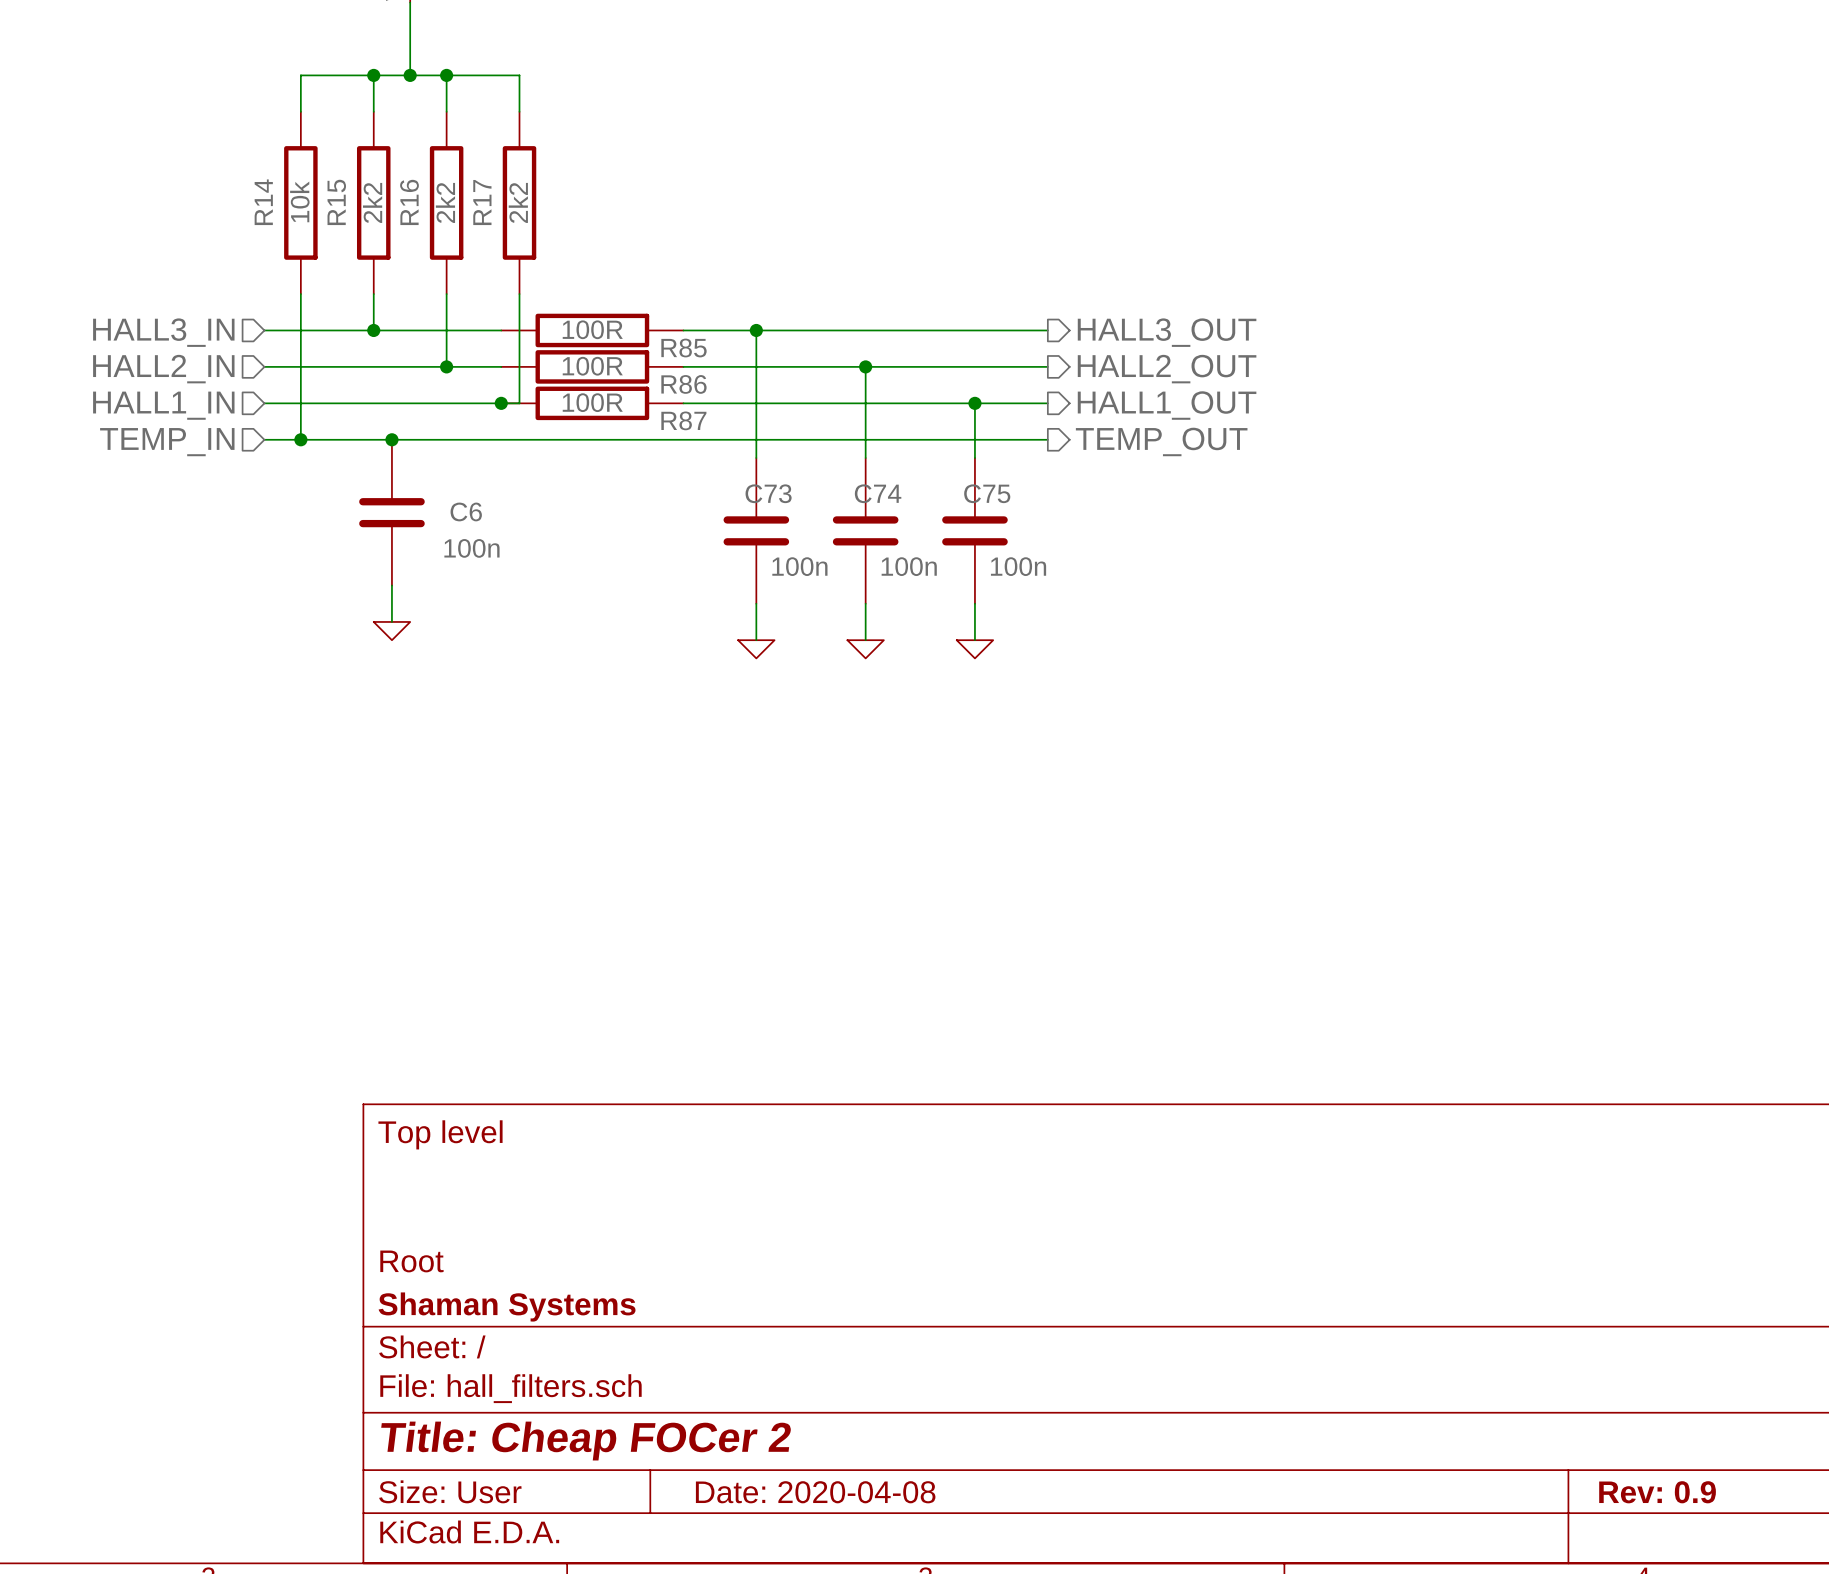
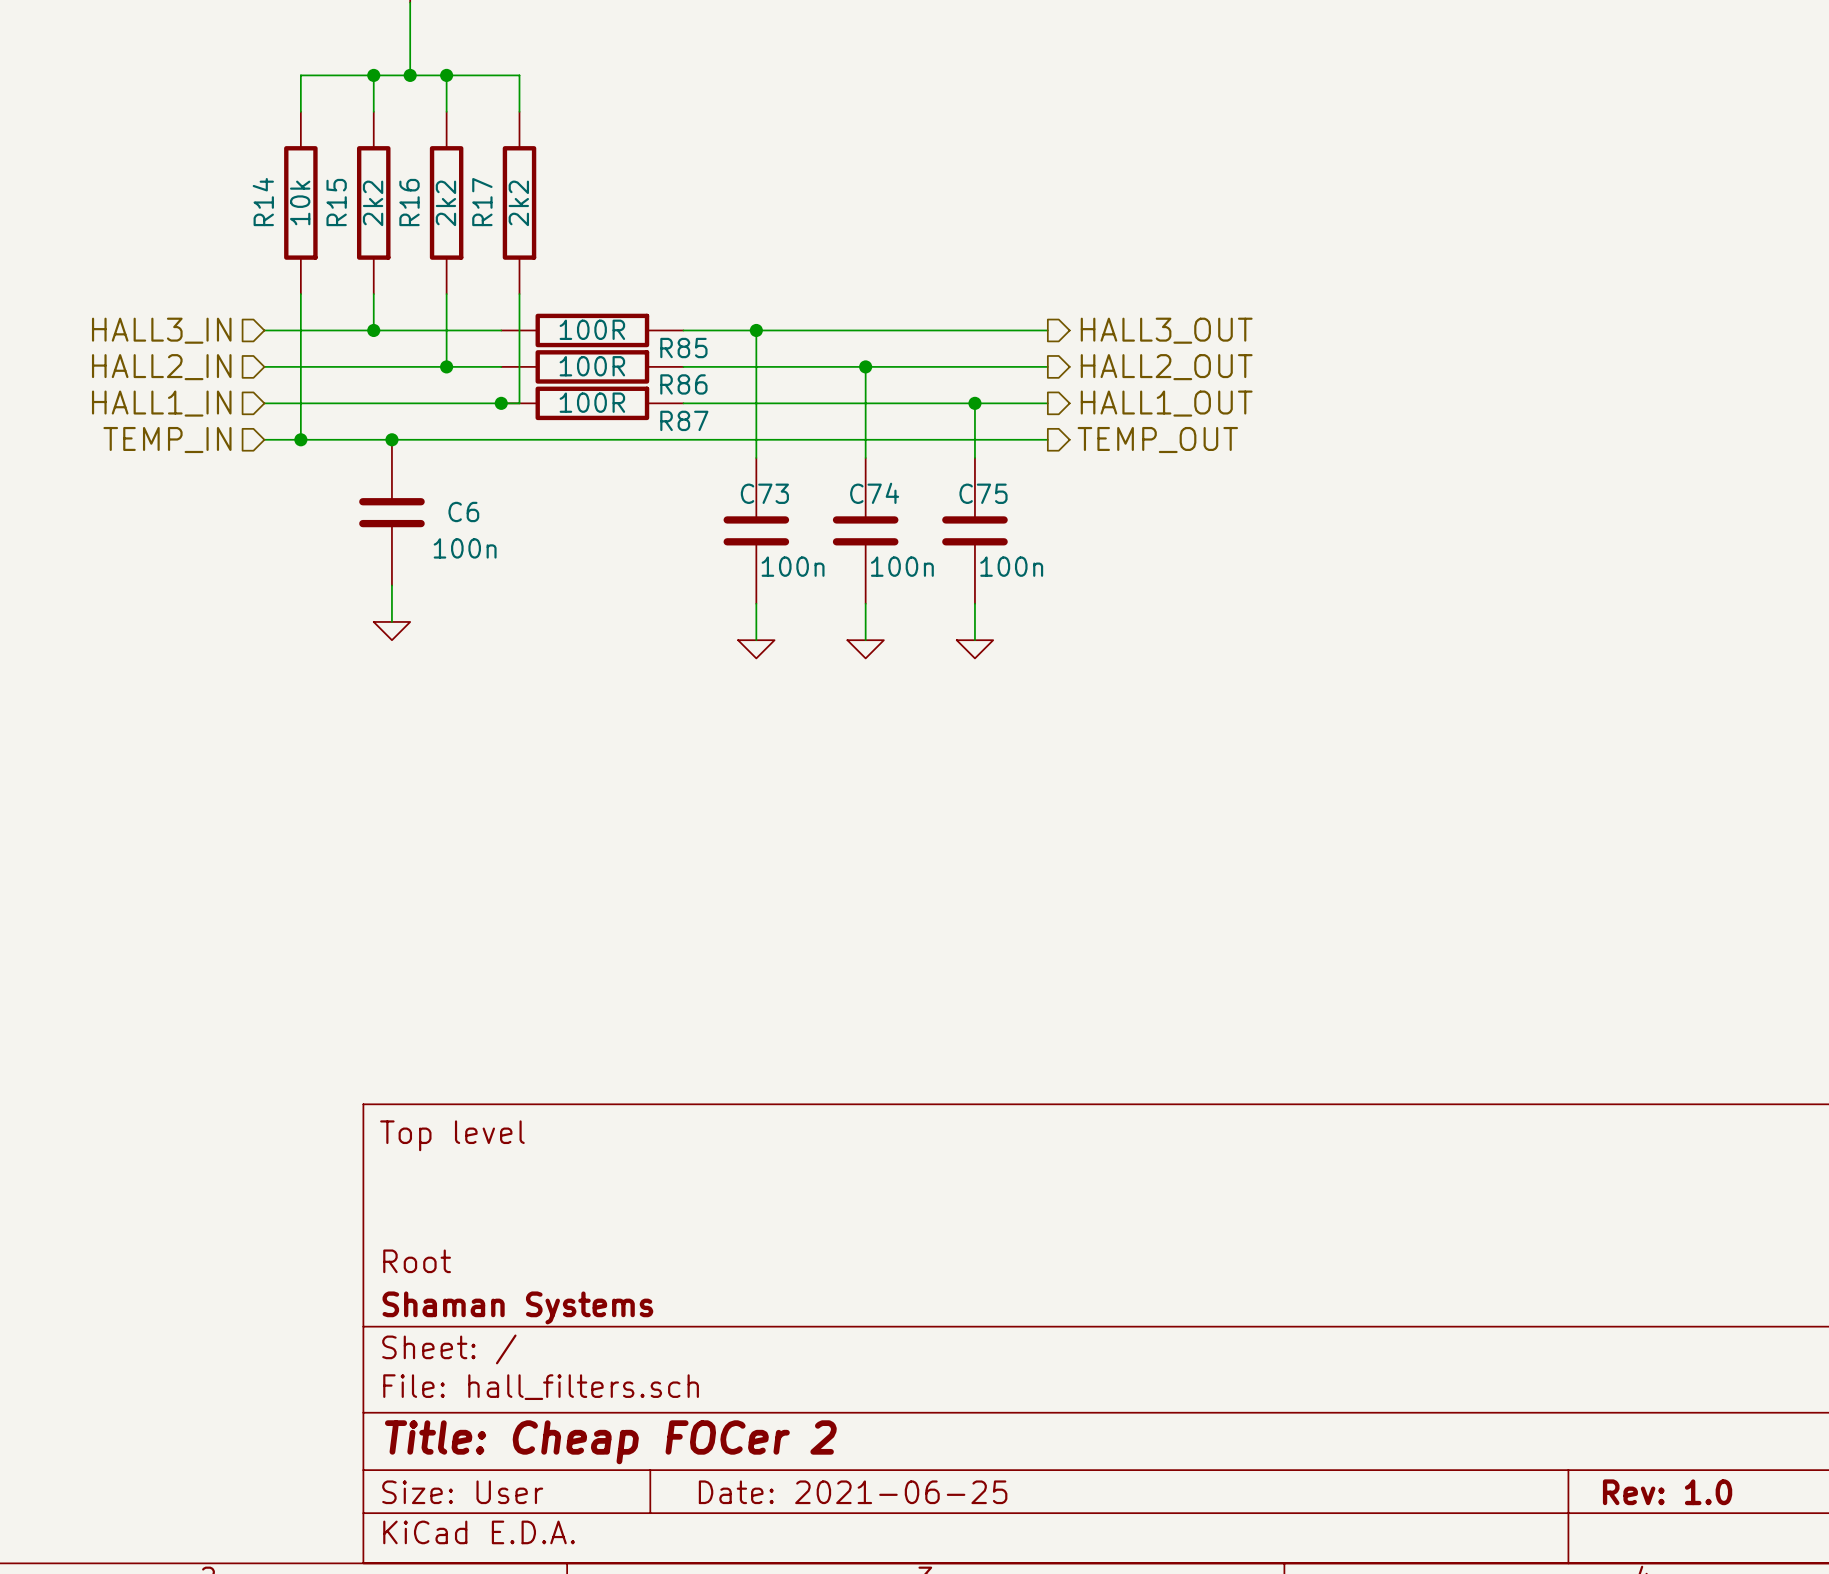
title block: Date: 2020-04-08 (815, 1492) -> Date: 2021-06-25 (853, 1492)
title block: Rev: 0.9 (1657, 1492) -> Rev: 1.0 (1667, 1492)

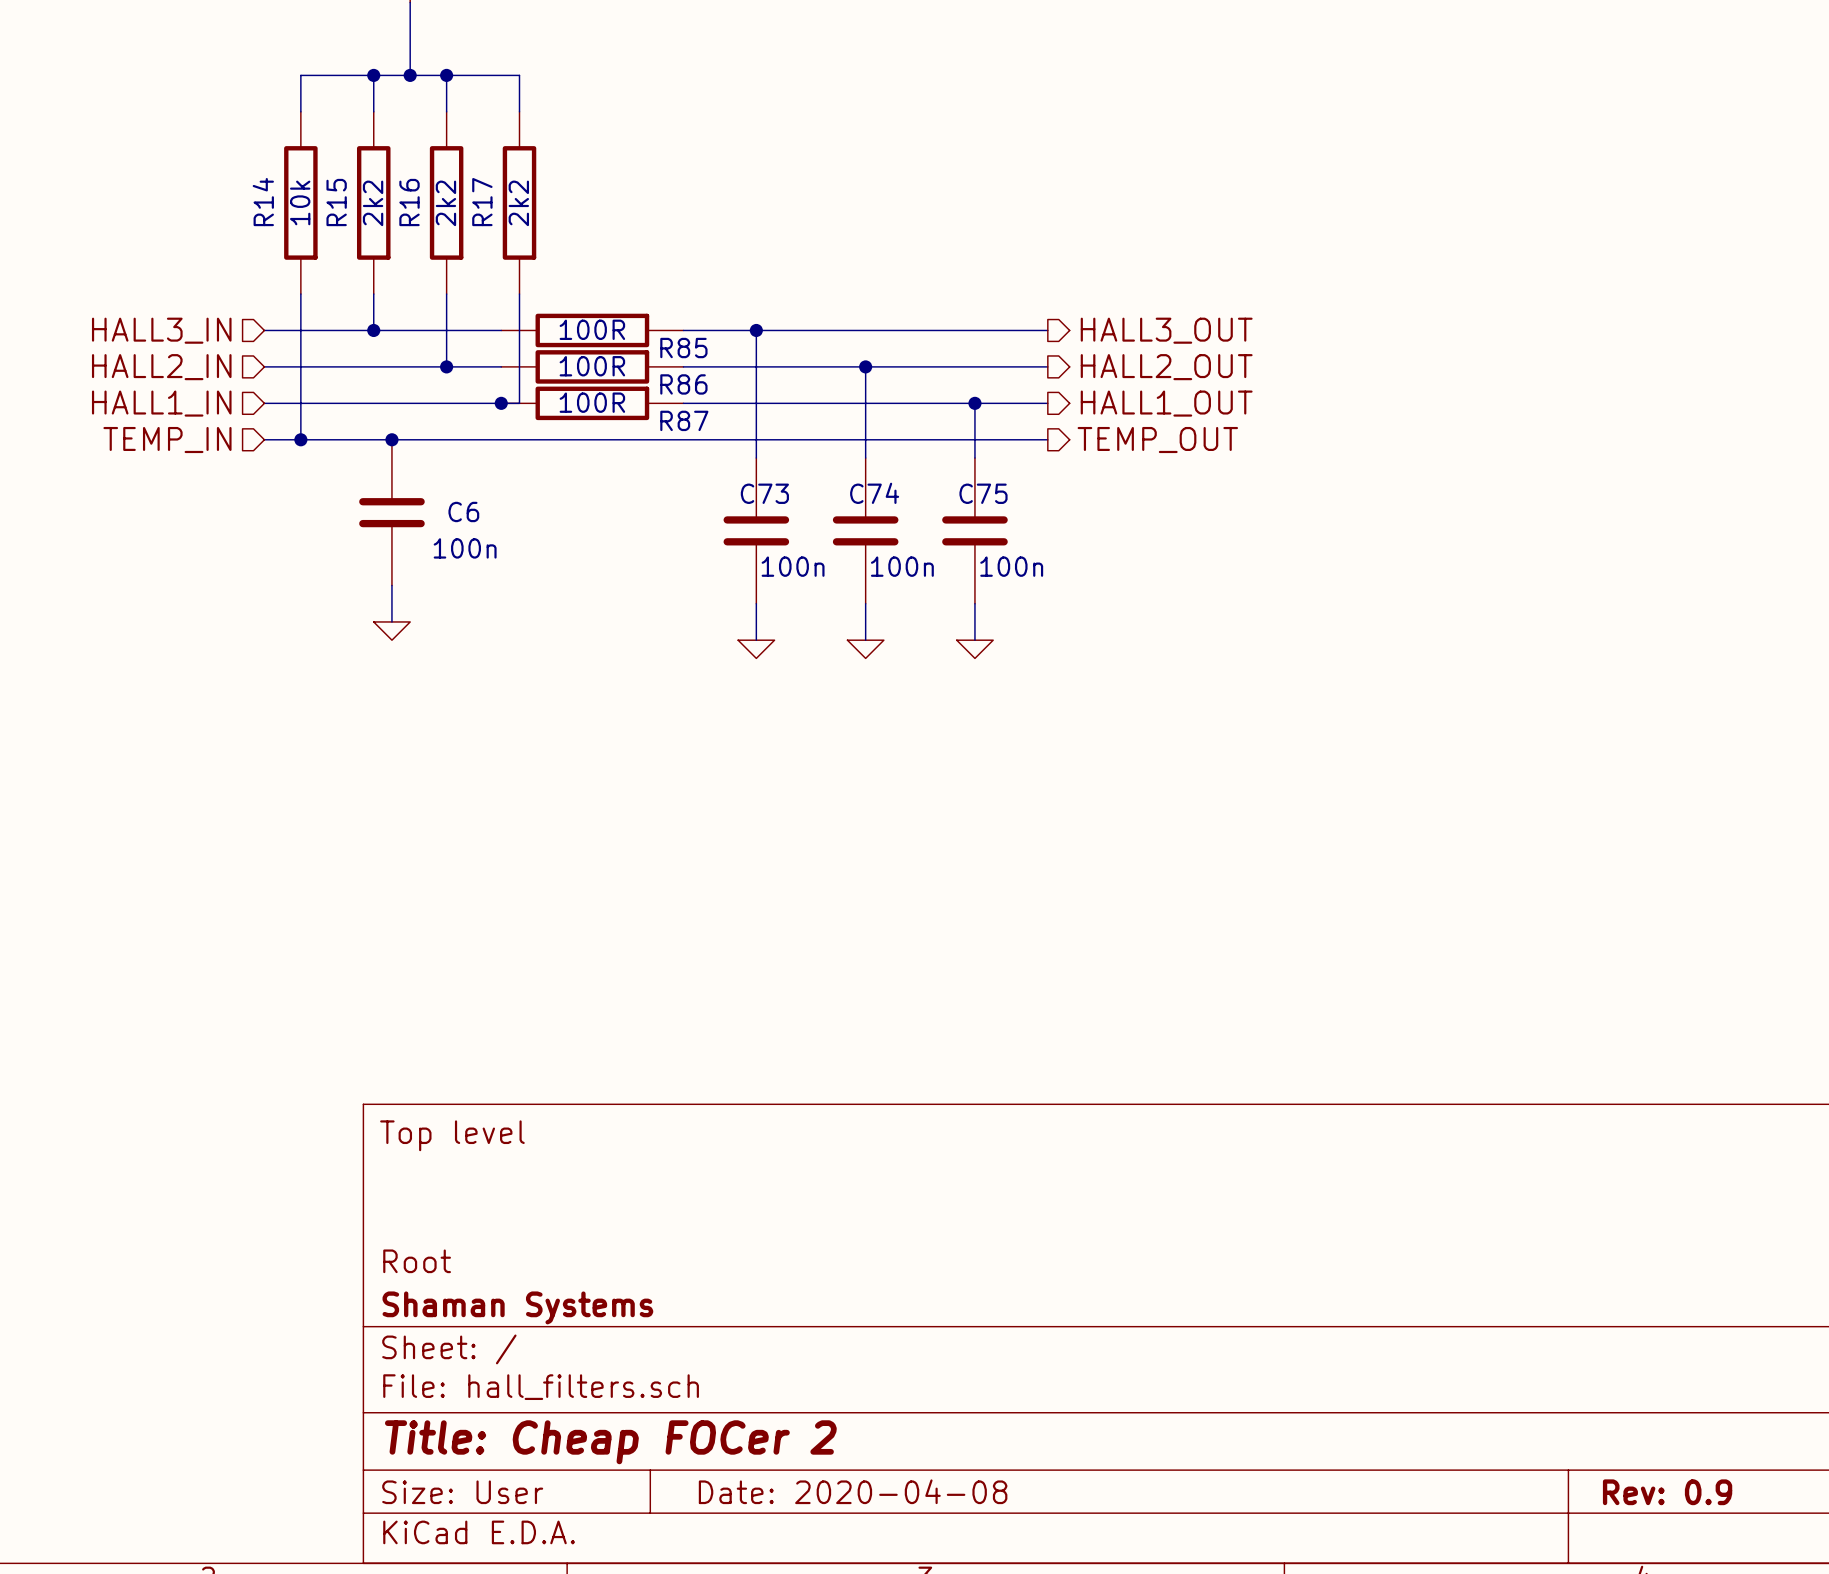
title block: Date: 2021-06-25 (853, 1492) -> Date: 2020-04-08 (853, 1491)
title block: Rev: 1.0 (1667, 1492) -> Rev: 0.9 (1667, 1492)

